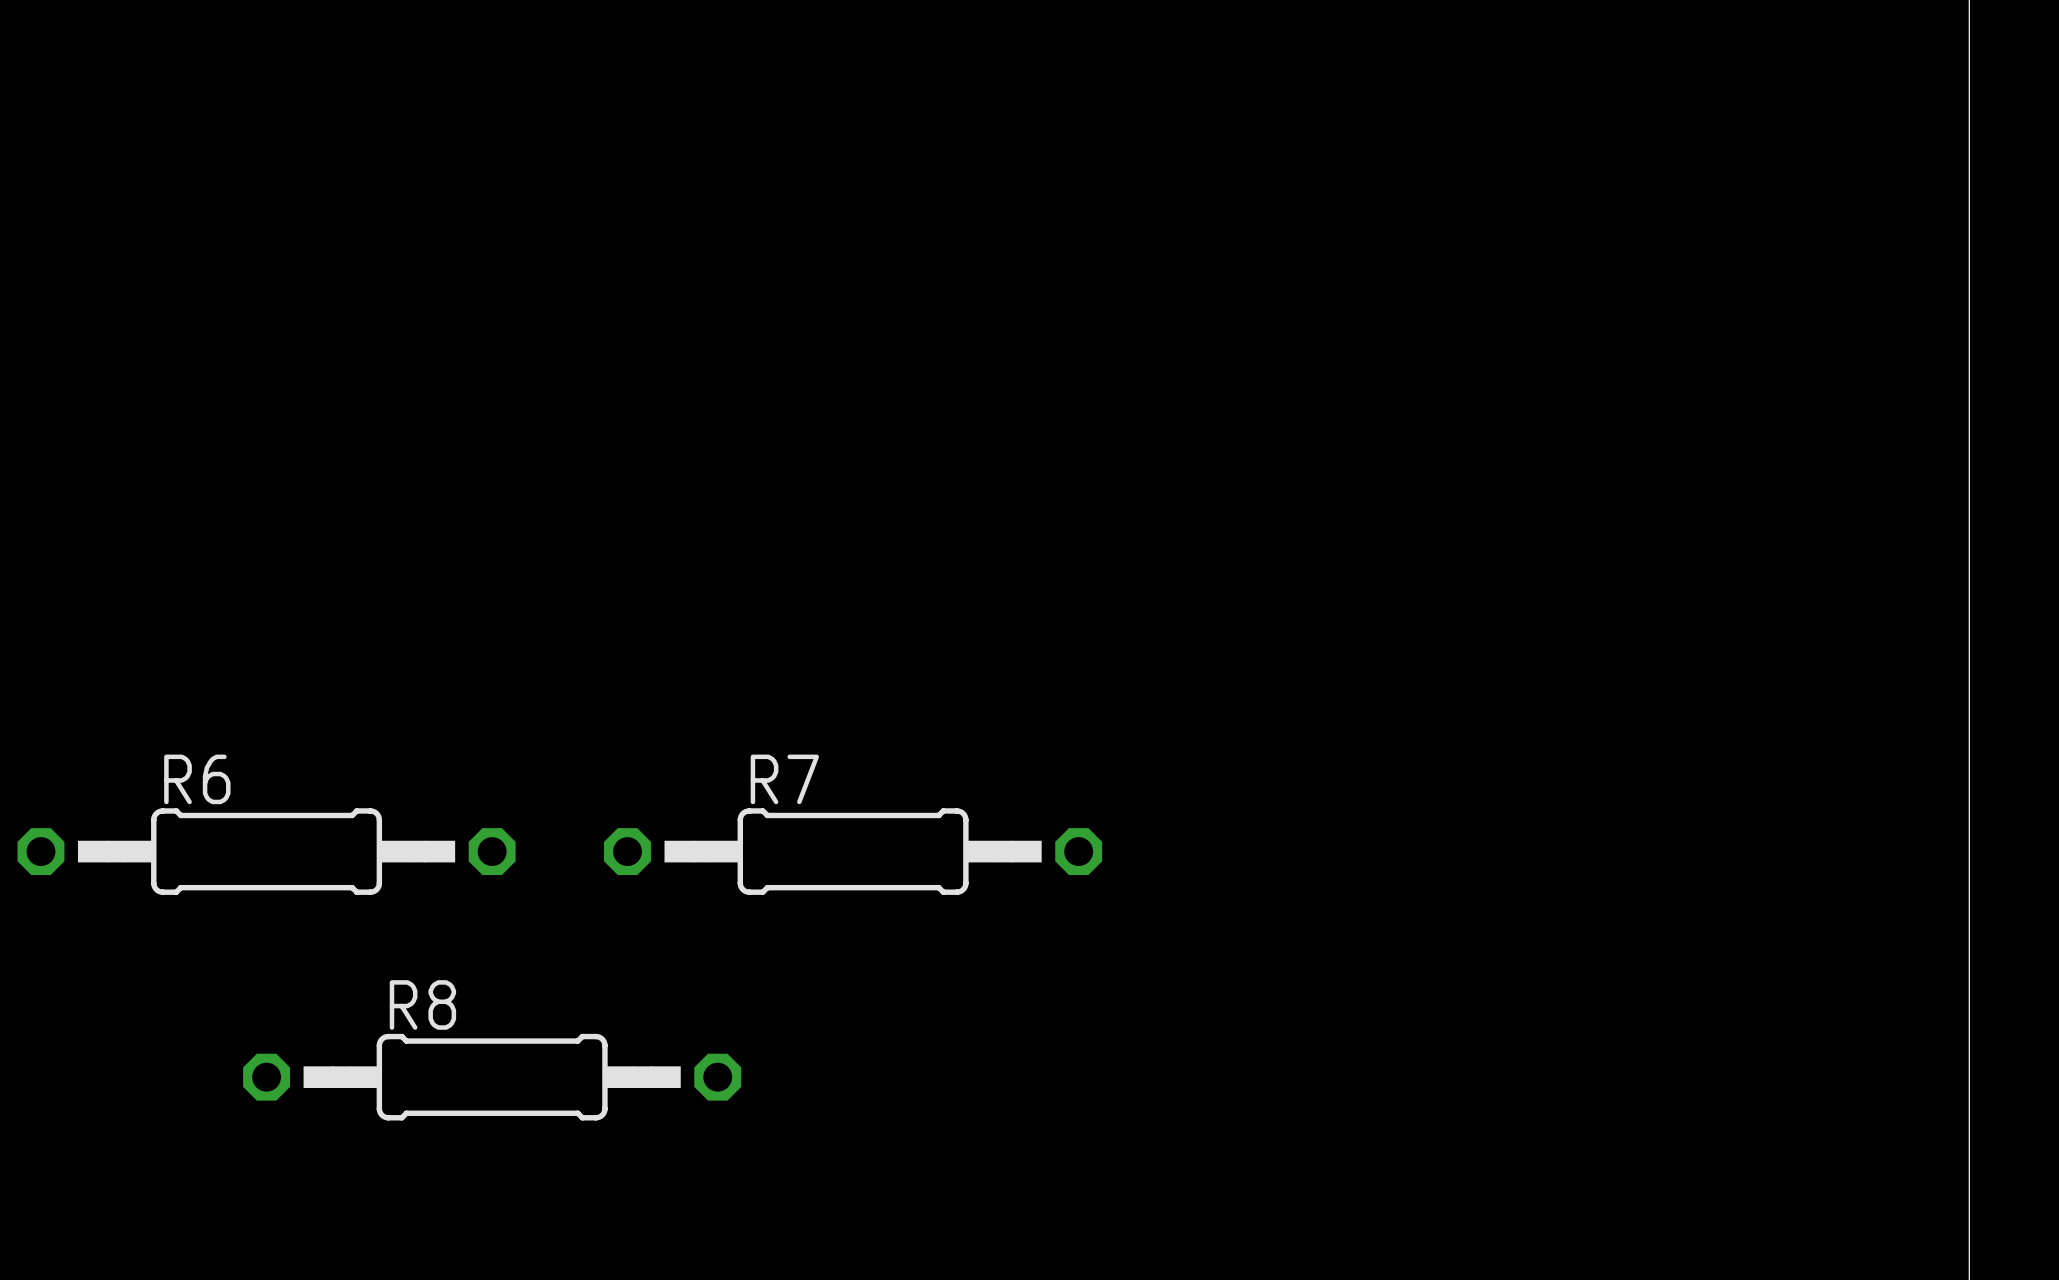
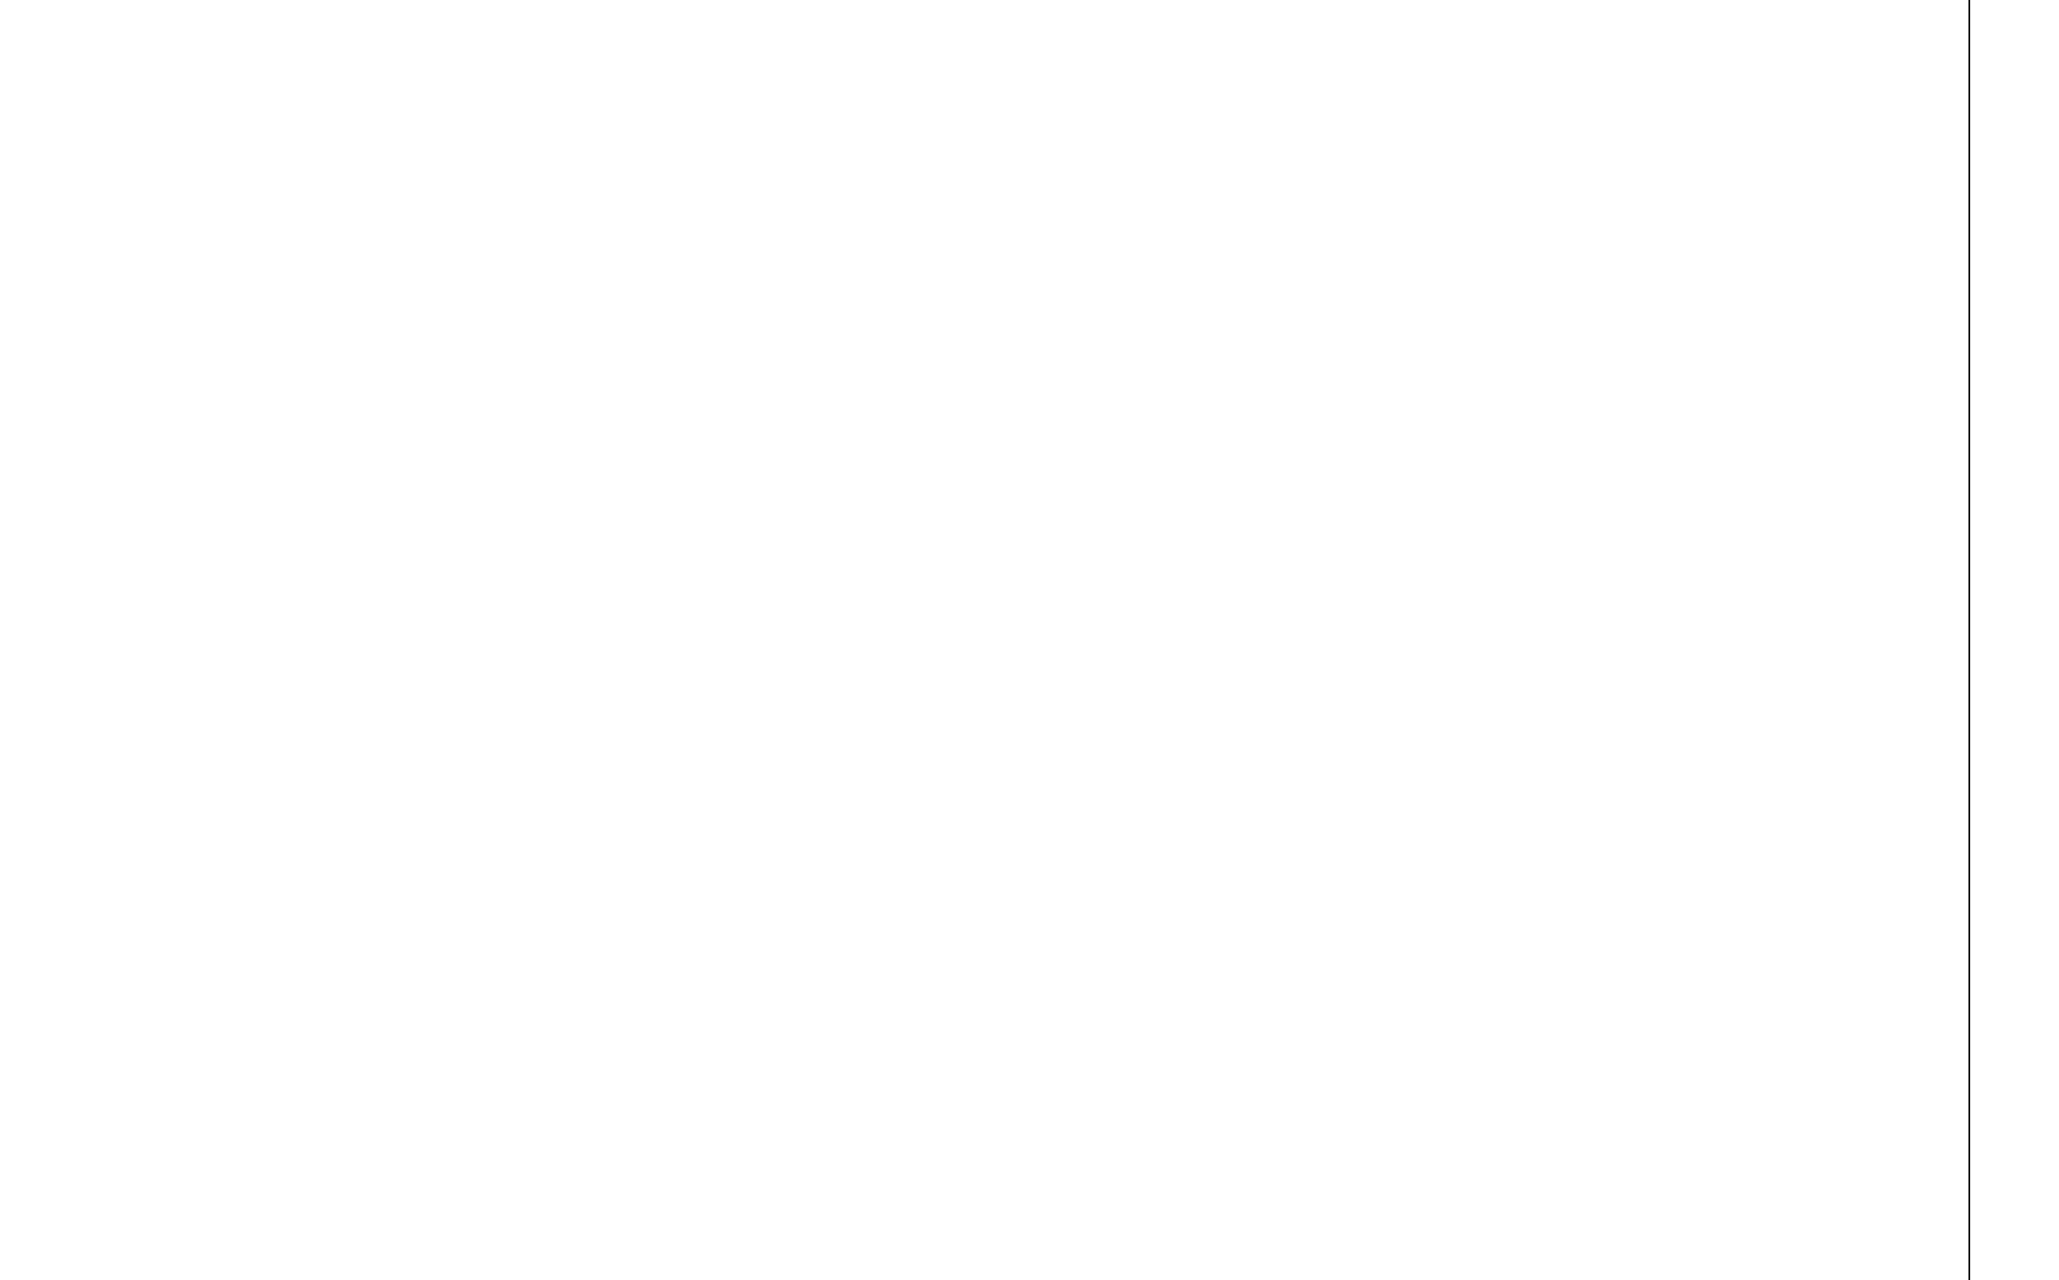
R6: (266, 851) -> none
R7: (853, 851) -> none
R8: (492, 1077) -> none

